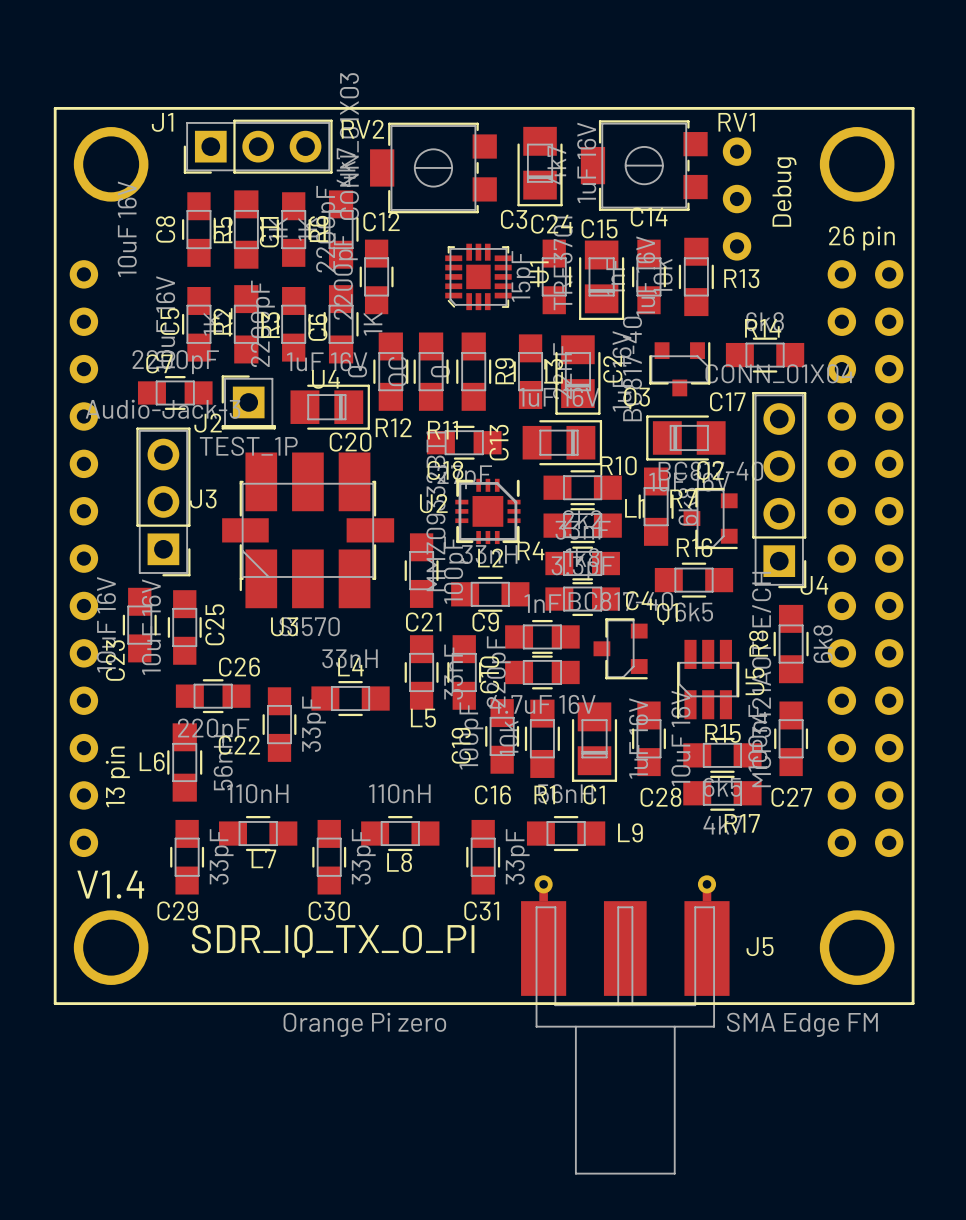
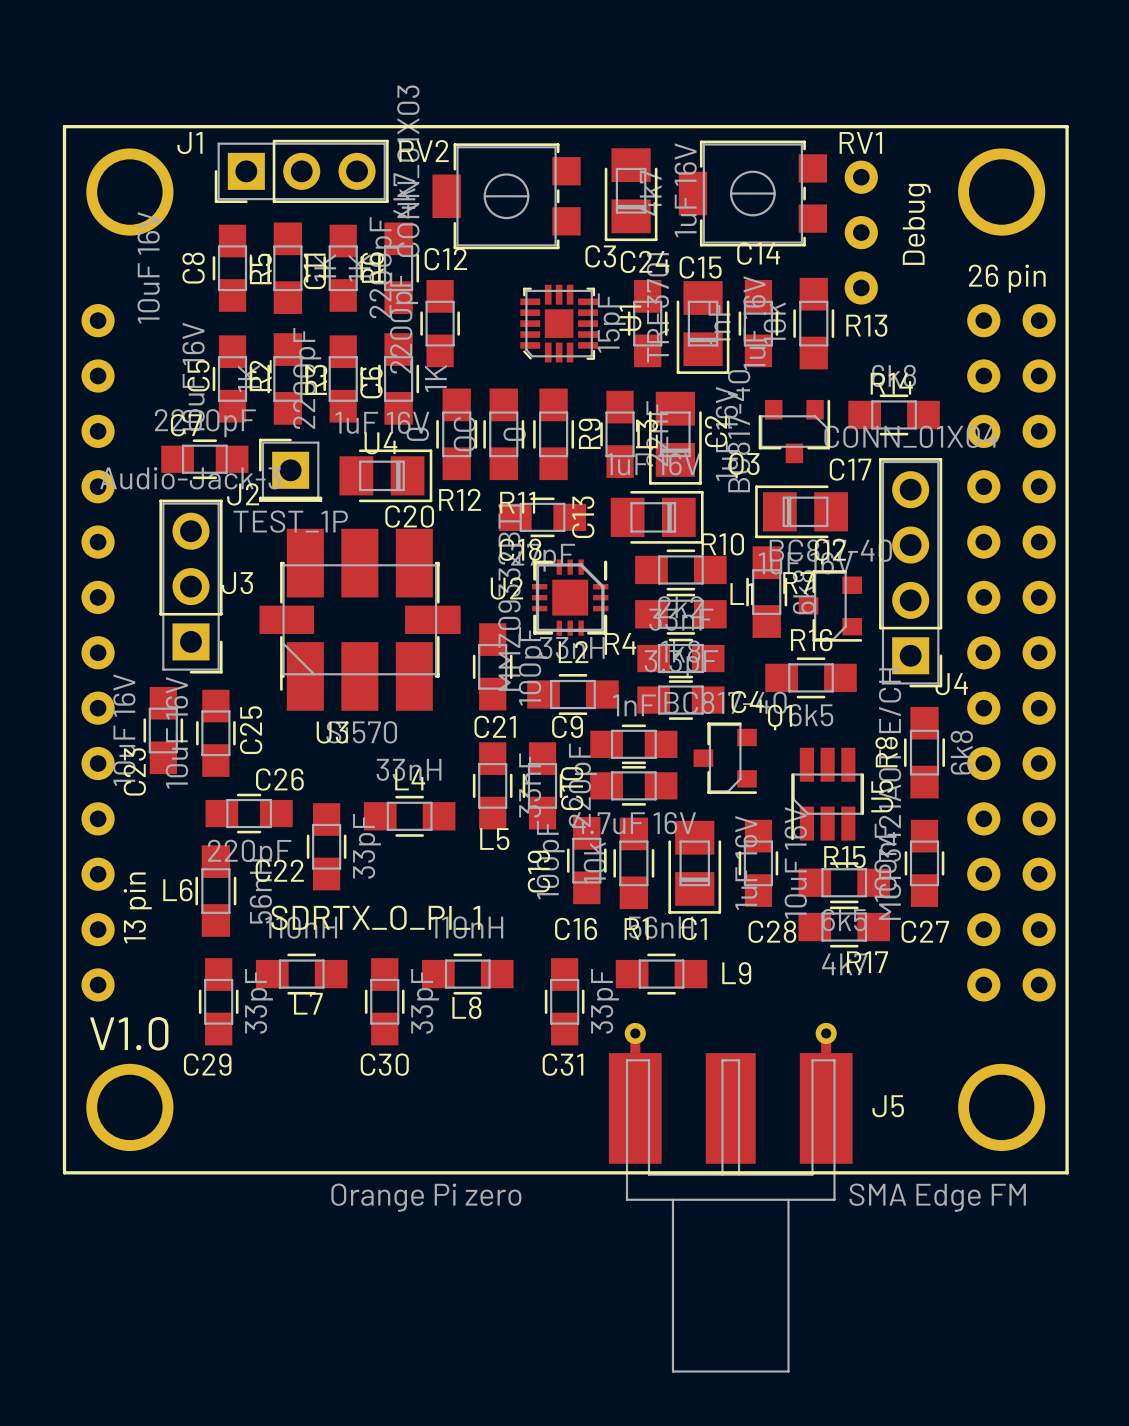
text: none -> SDRTX_O_PI_1 (375, 917)
text: V1.4 (110, 884) -> V1.0 (129, 1033)
text: SDR_IQ_TX_O_PI (333, 941) -> none

